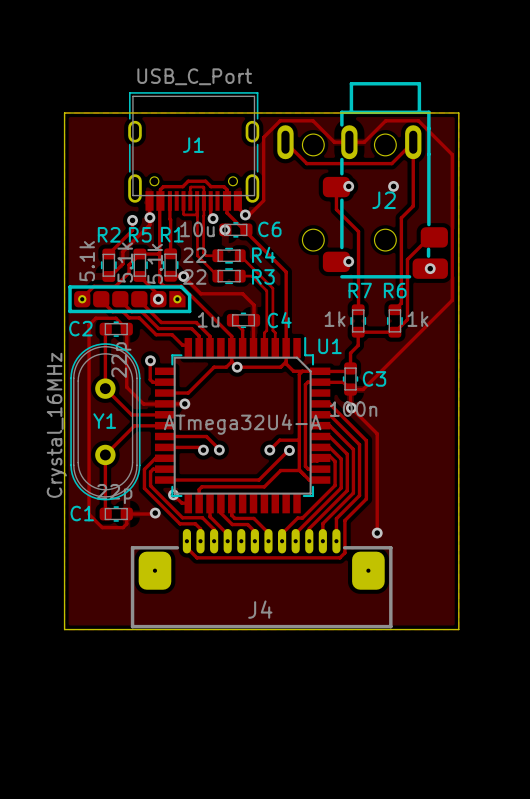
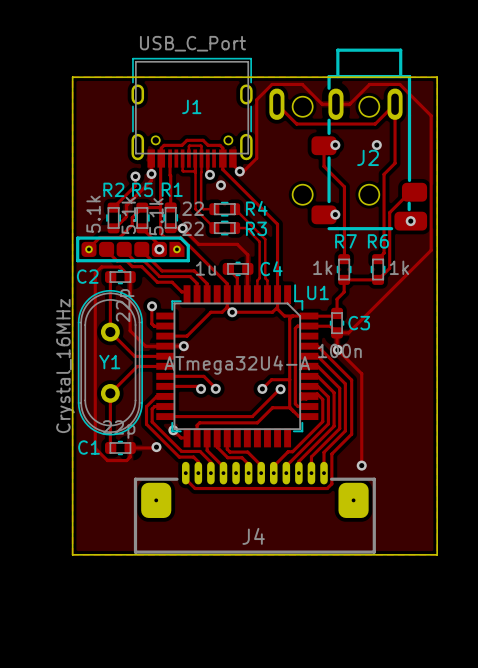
C6: 10u (235, 229) -> none

